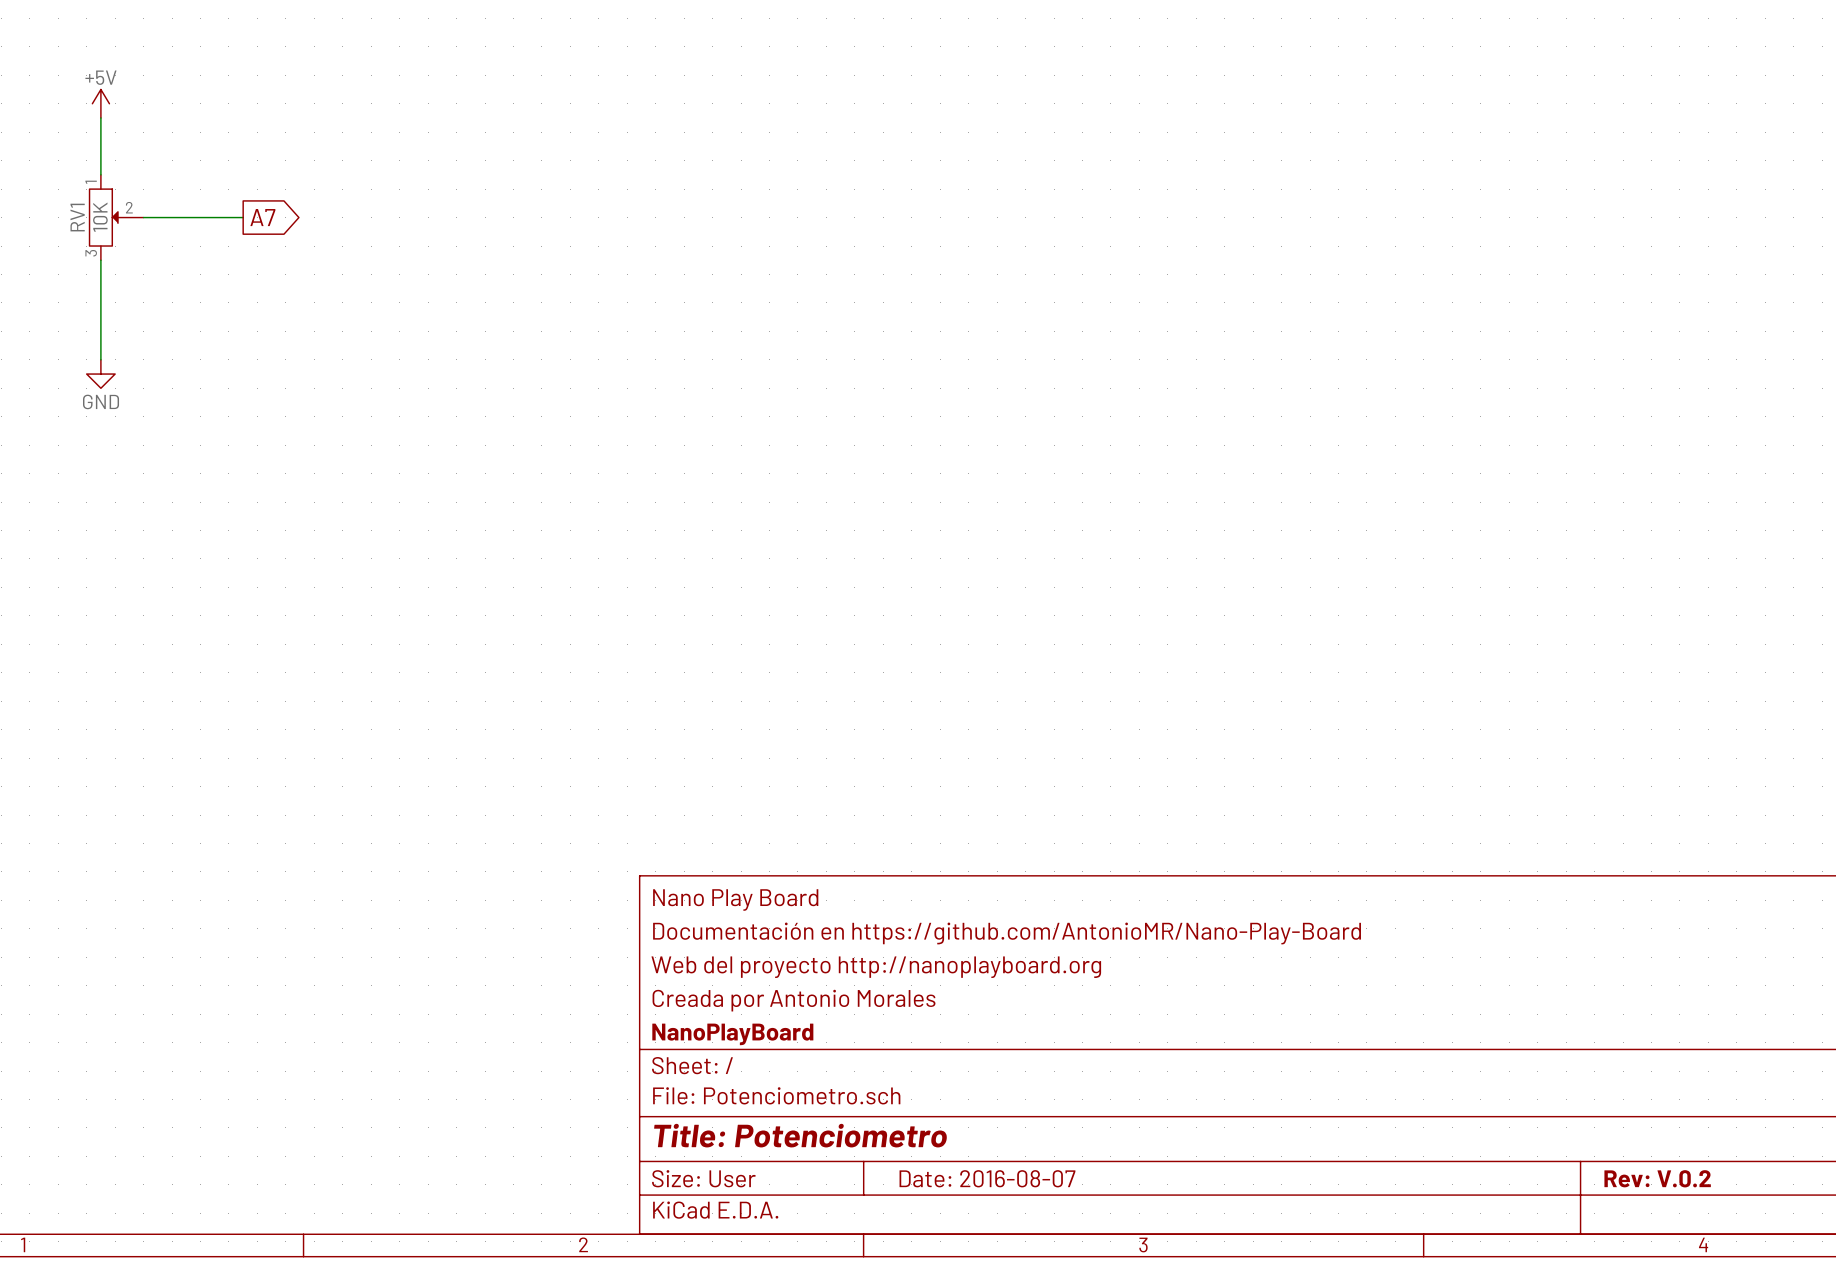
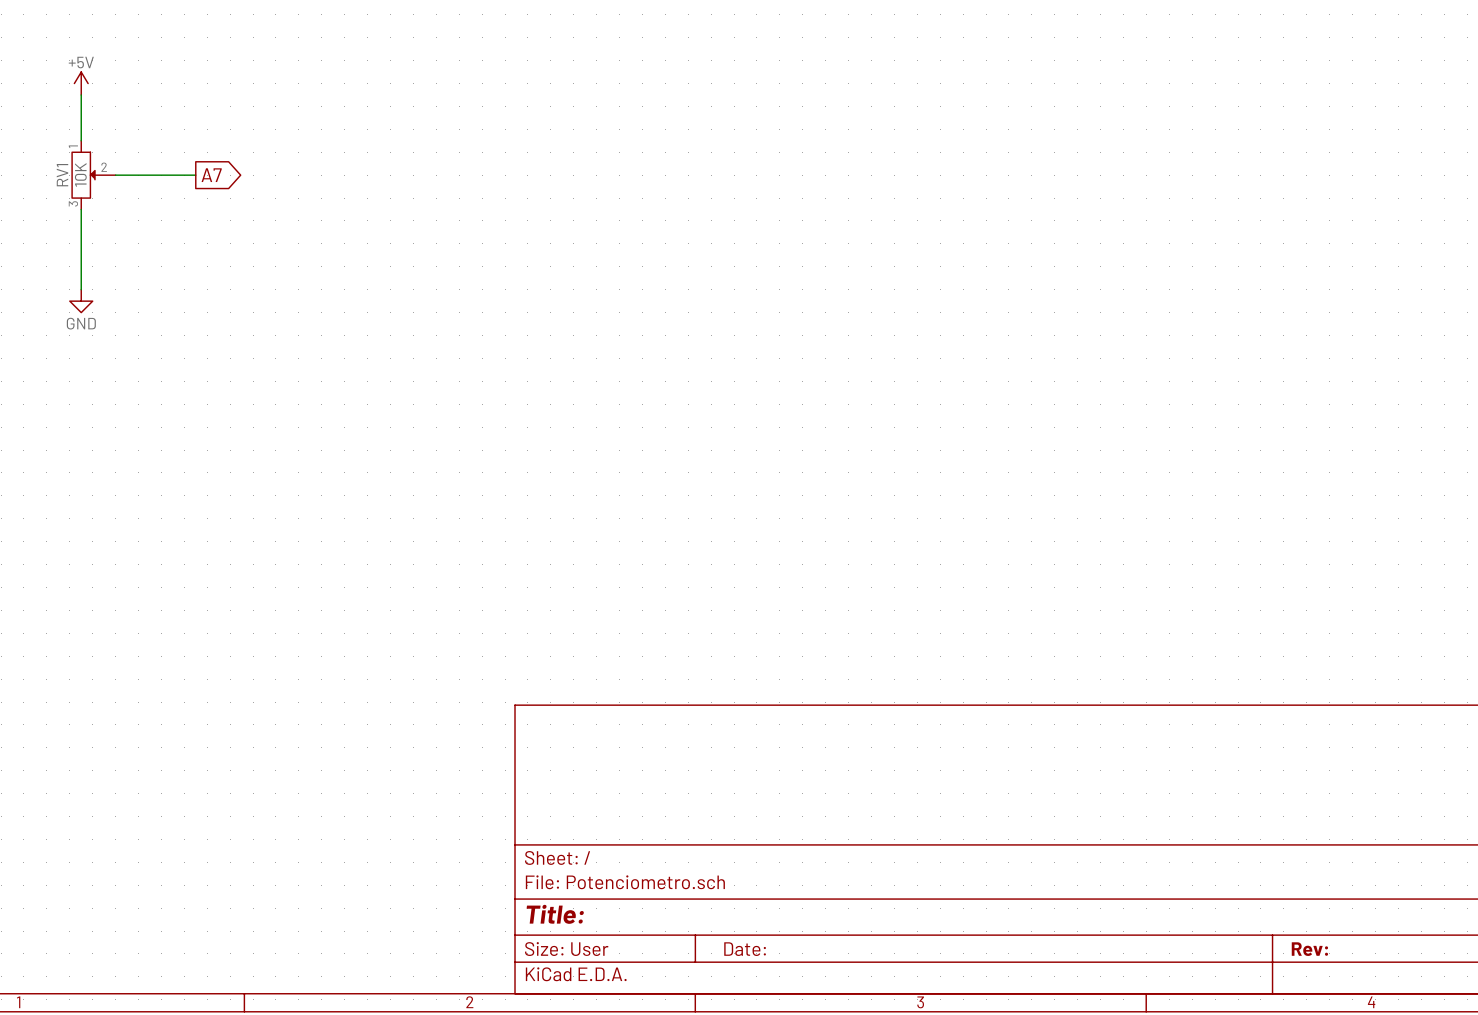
title block: Nano Play Board (735, 900) -> none
title block: Documentación en https://github.com/AntonioMR/Nano-Play-Board (1007, 933) -> none
title block: Web del proyecto http://nanoplayboard.org (876, 967) -> none
title block: Creada por Antonio Morales (794, 1000) -> none
title block: NanoPlayBoard (732, 1034) -> none
title block: Title: Potenciometro (800, 1135) -> Title: (555, 914)
title block: Date: 2016-08-07 (987, 1178) -> Date: (745, 949)
title block: Rev: V.0.2 (1657, 1178) -> Rev: (1309, 949)

